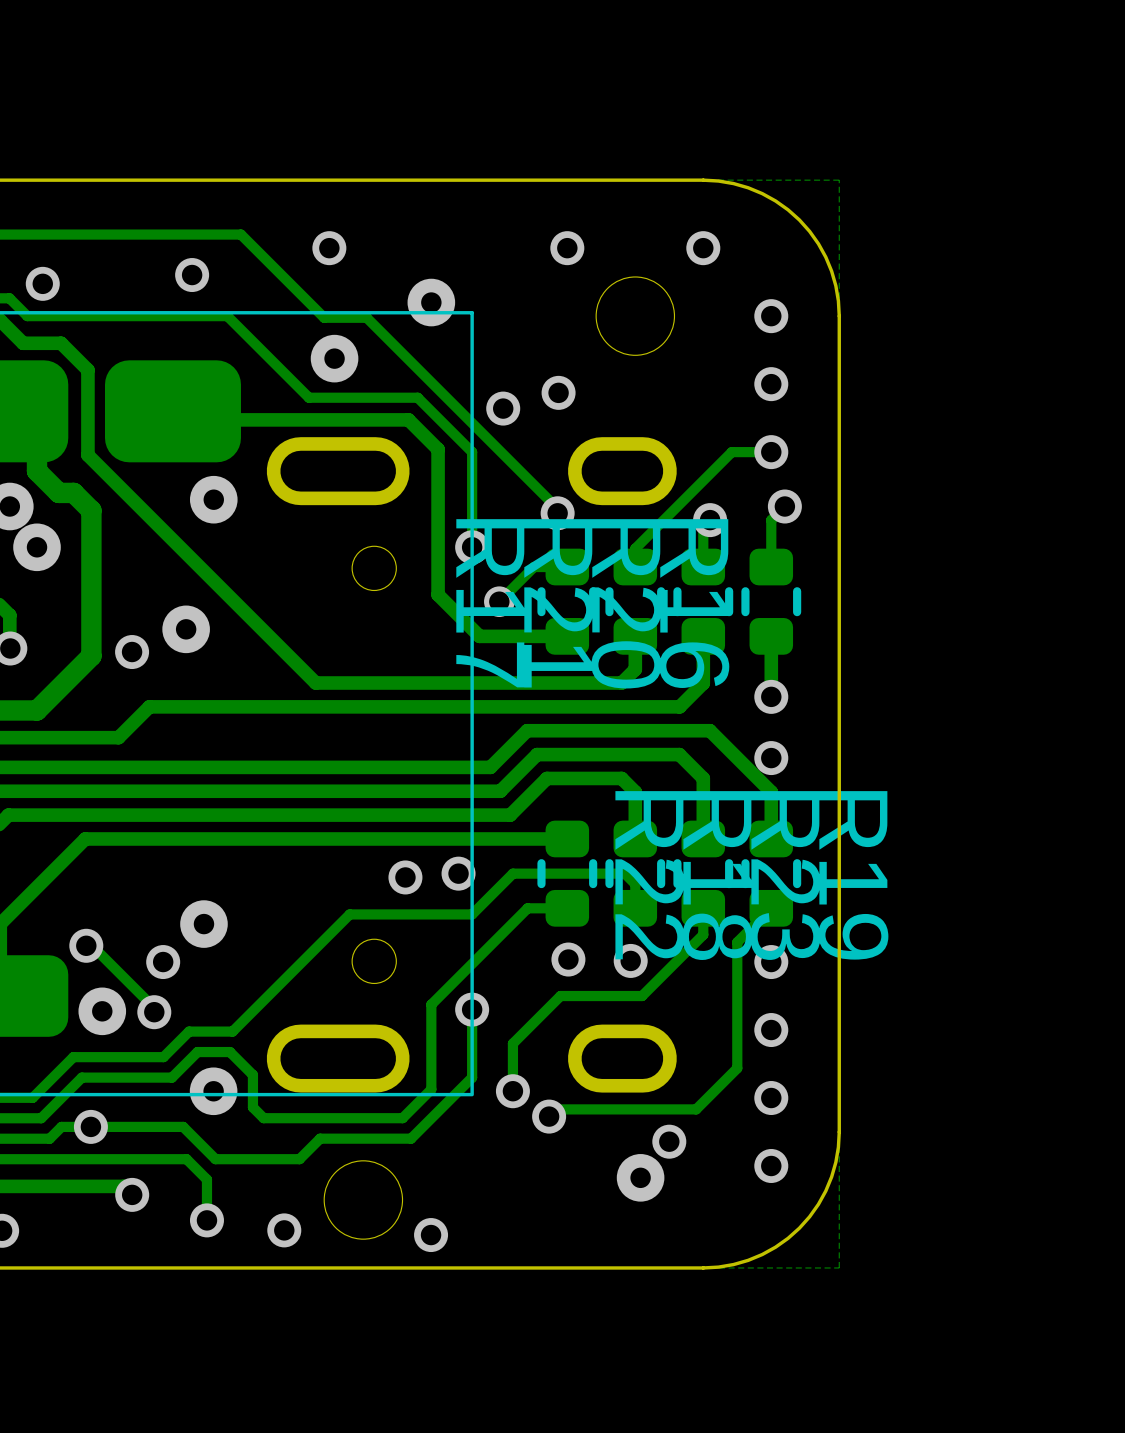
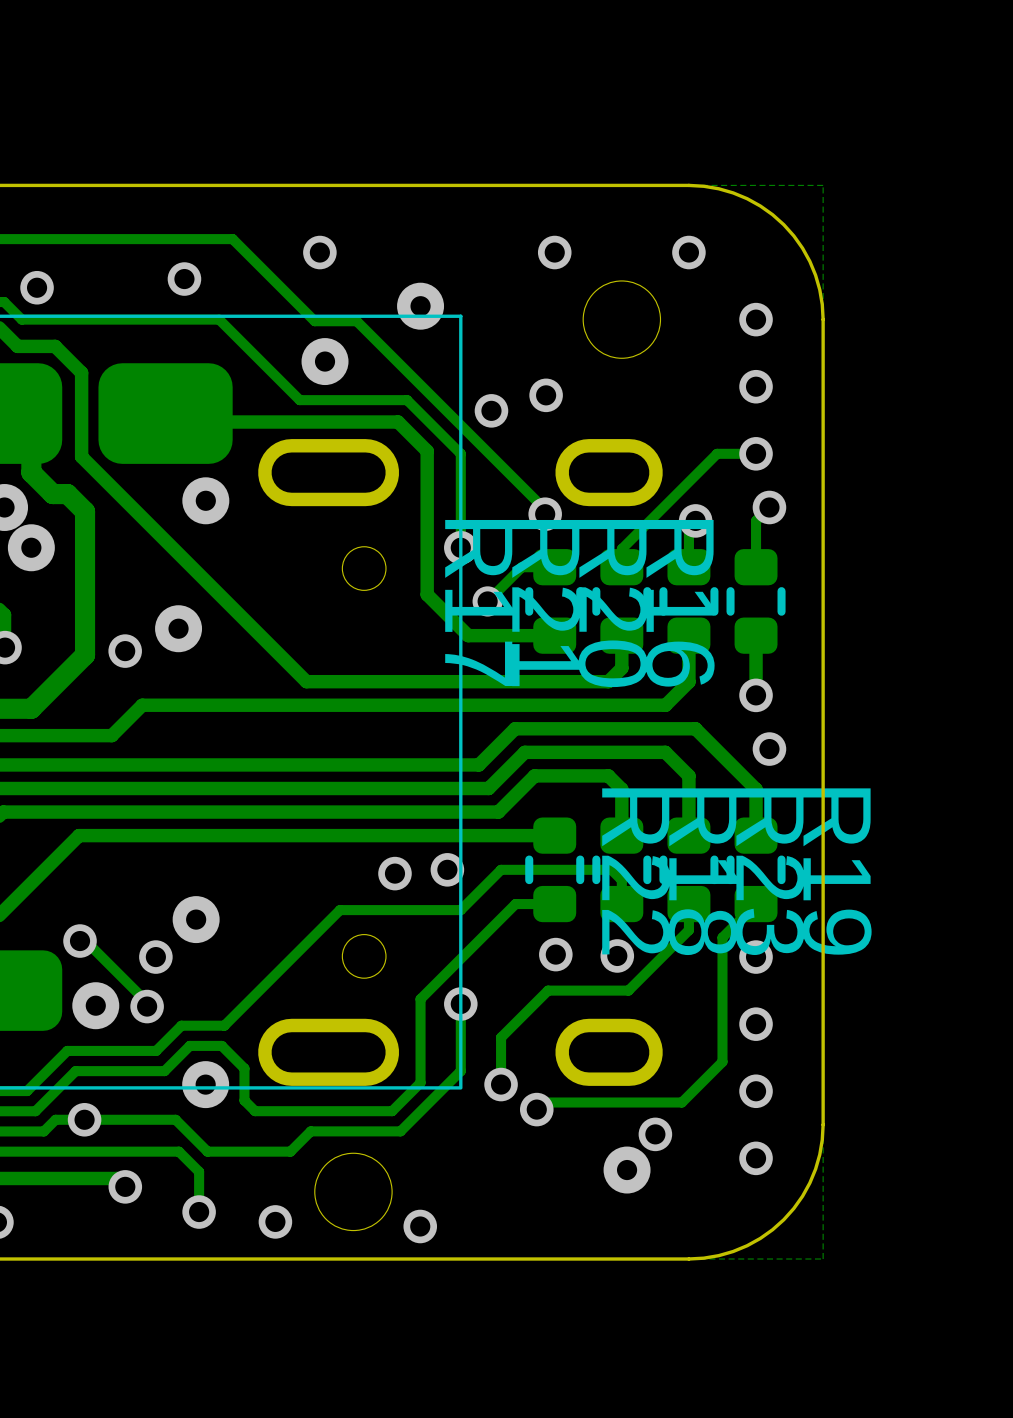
via position: (771, 758) -> (769, 749)

